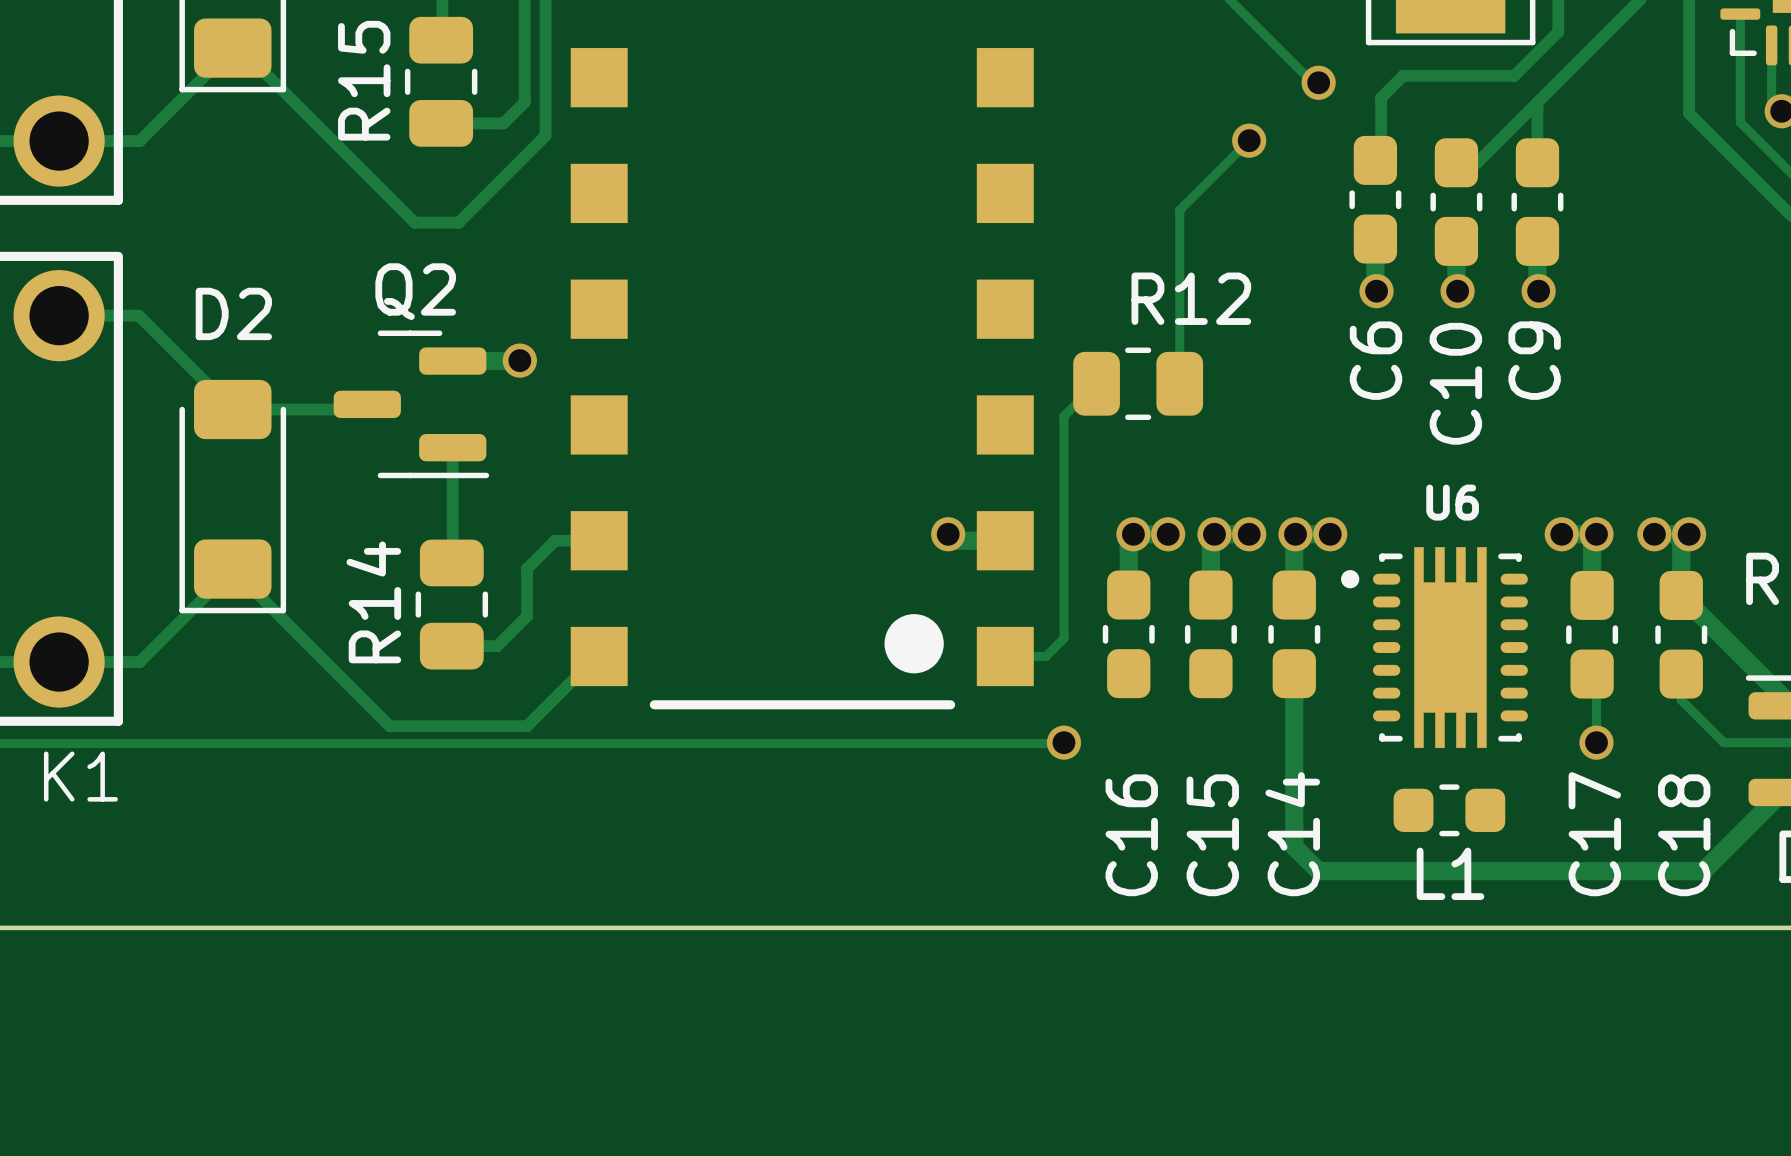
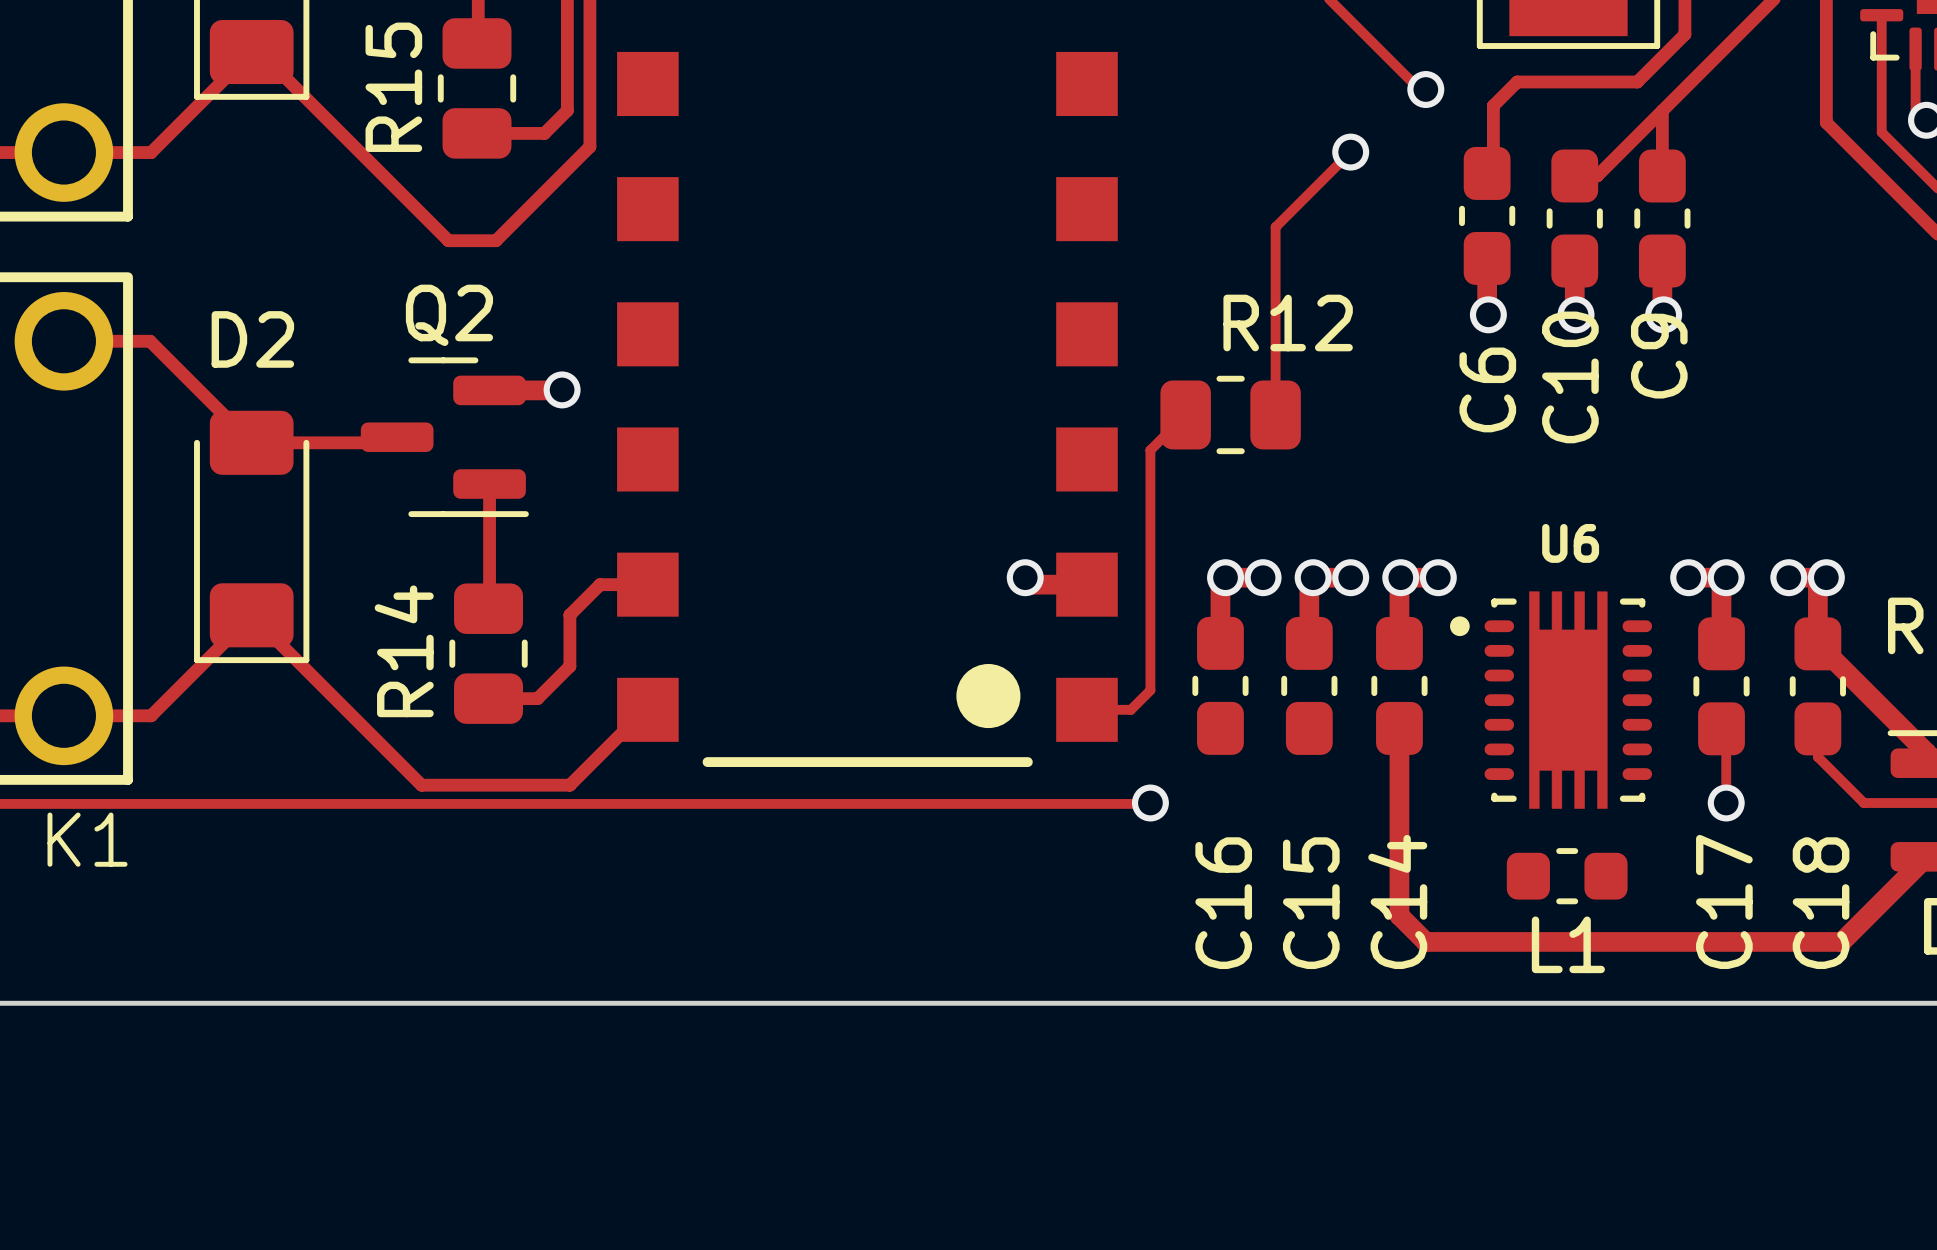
C9 name position: C9 (1534, 360) -> C9 (1659, 356)
C10 name position: C10 (1455, 383) -> C10 (1570, 377)

